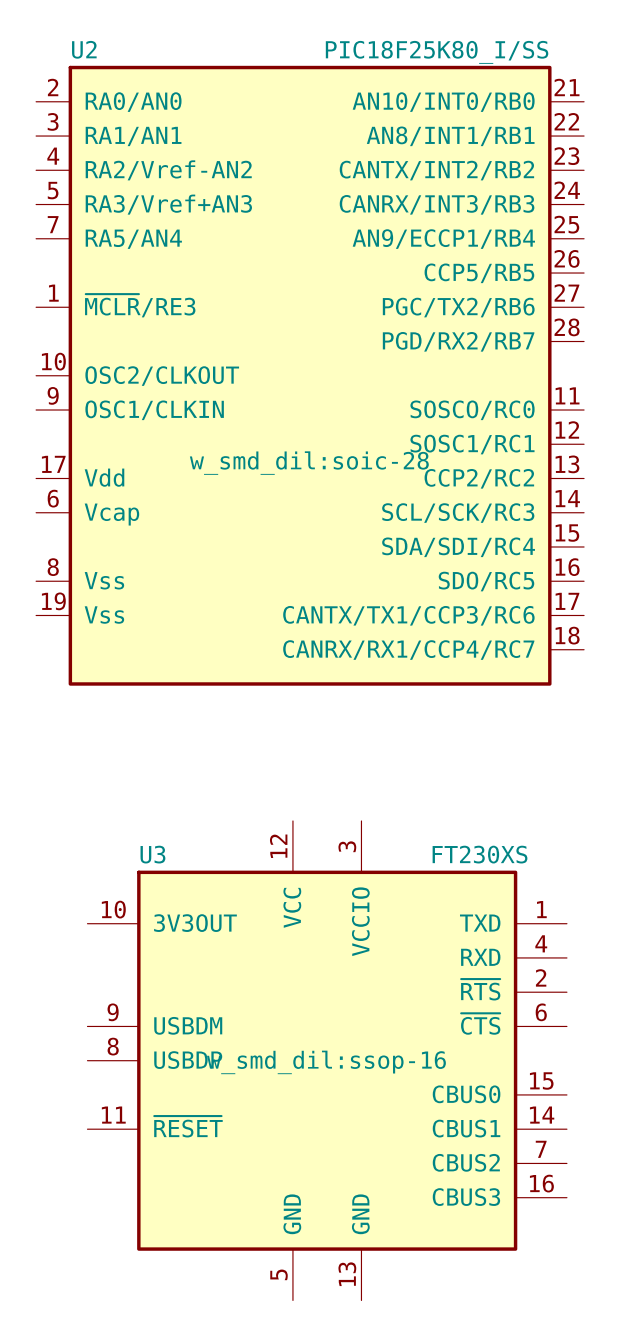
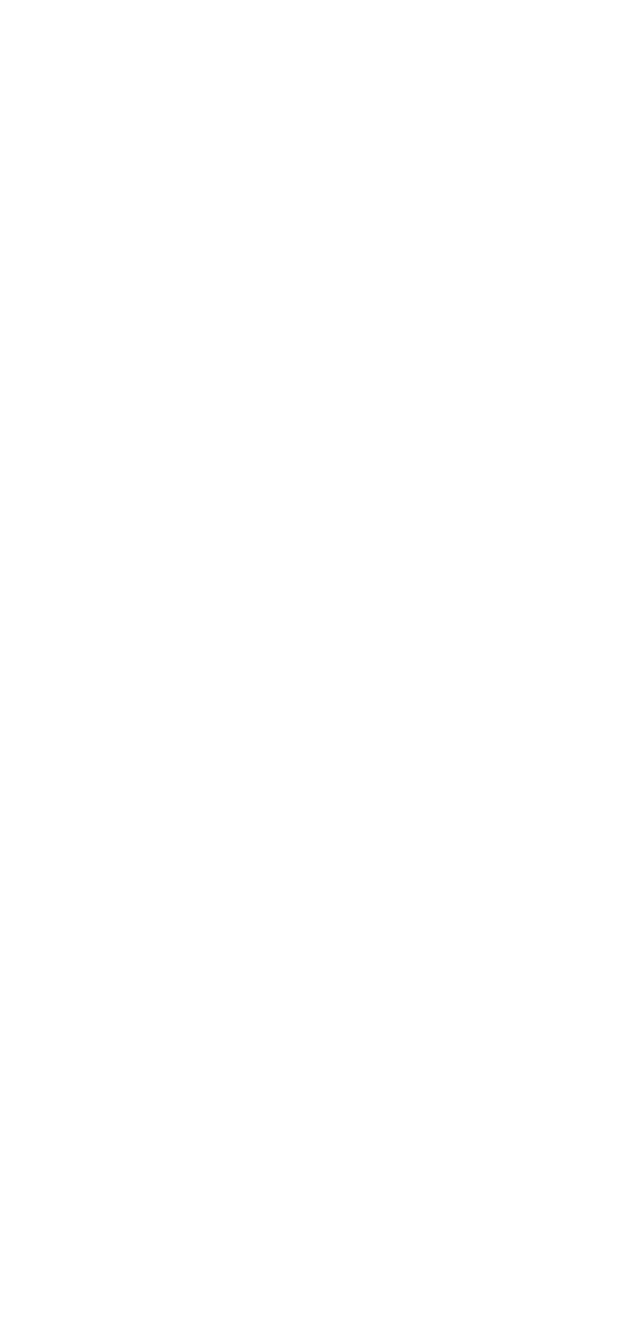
U2: PIC18F25K80_I/SS (310, 375) -> none
U3: FT230XS (327, 1060) -> none

